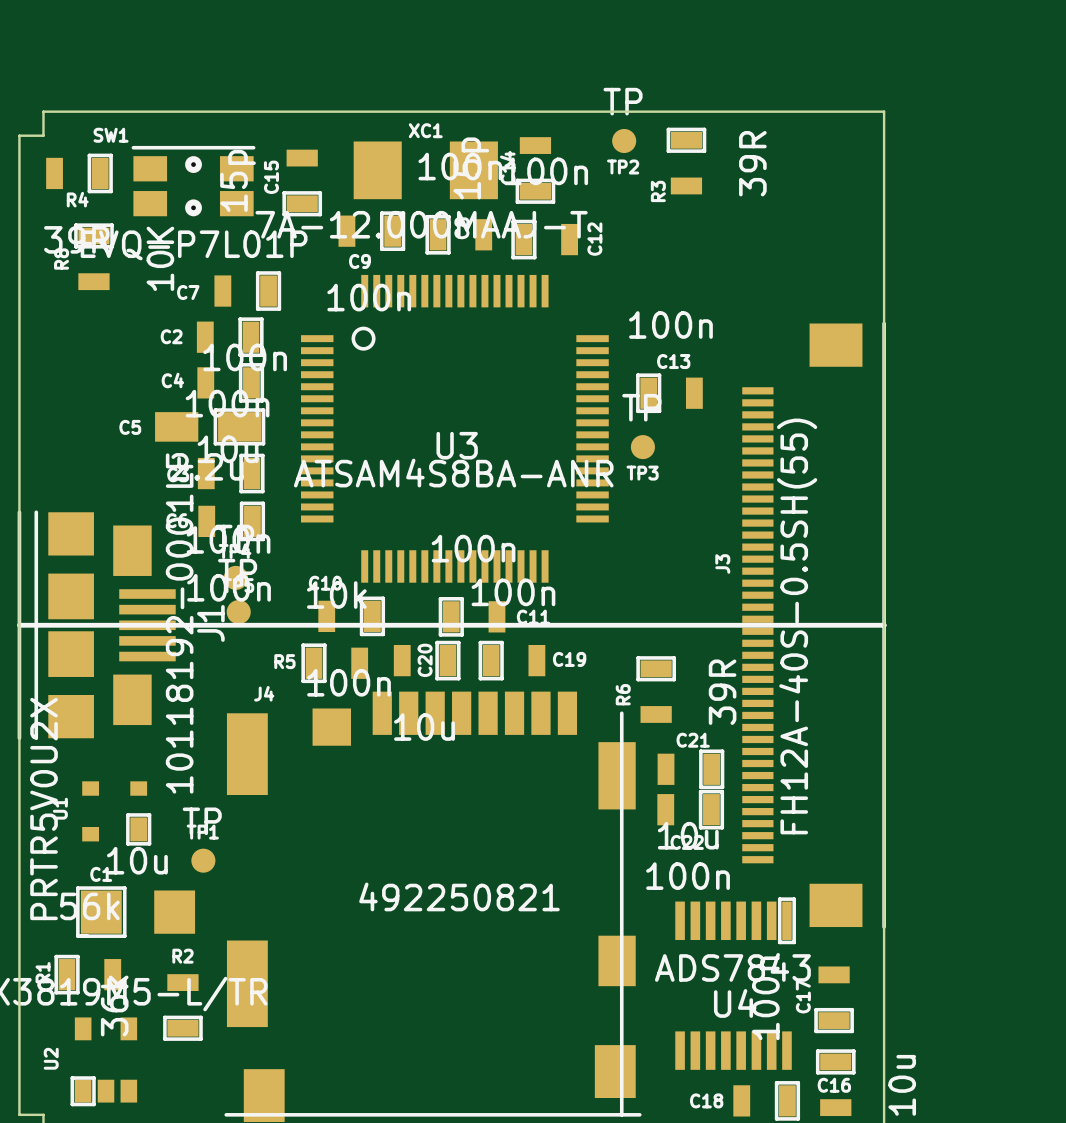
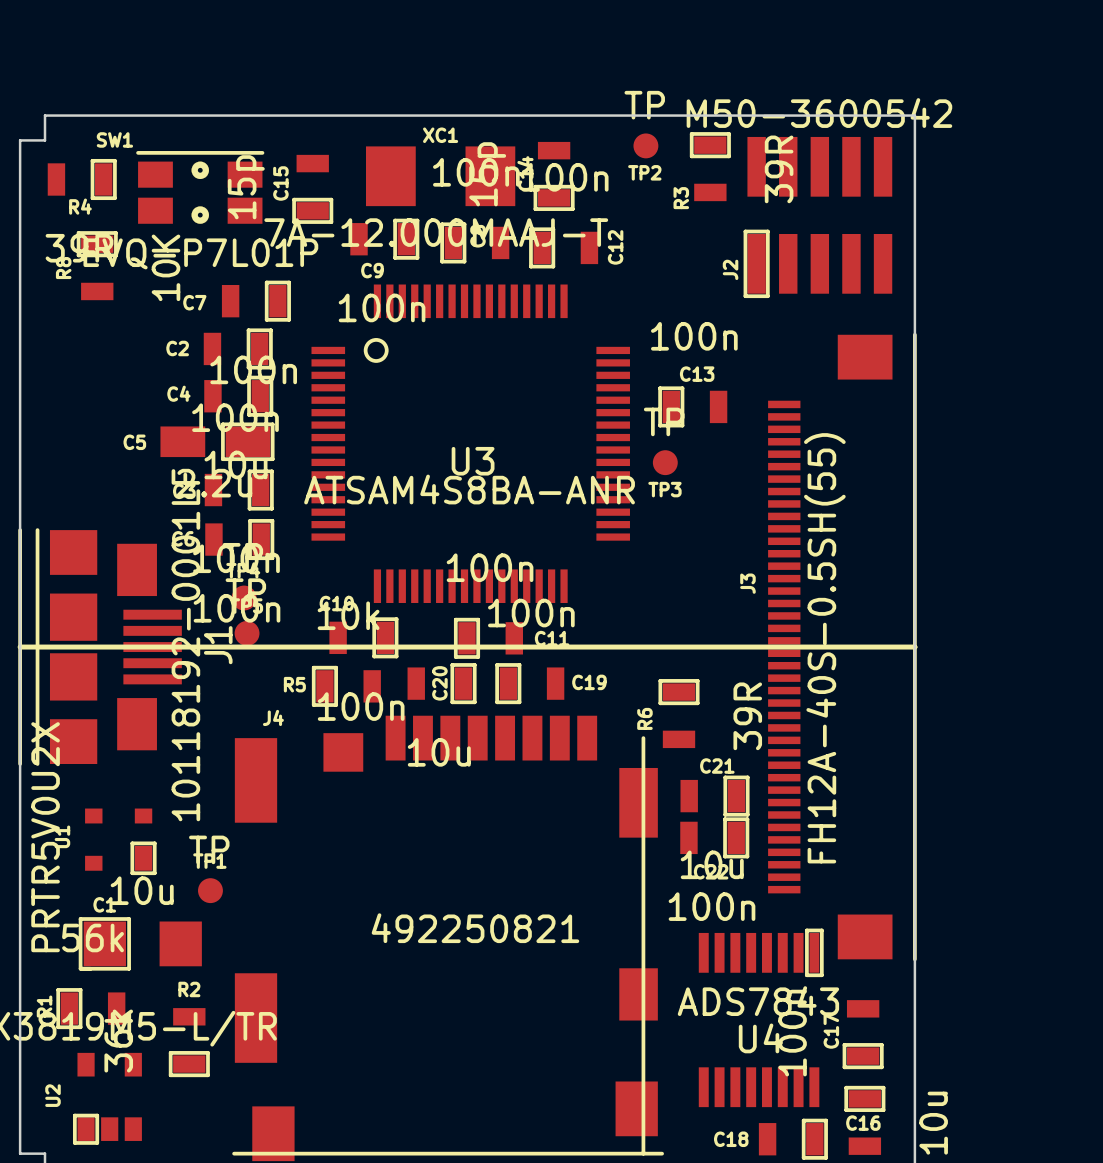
J2: none -> M50-3600542 (817, 217)

